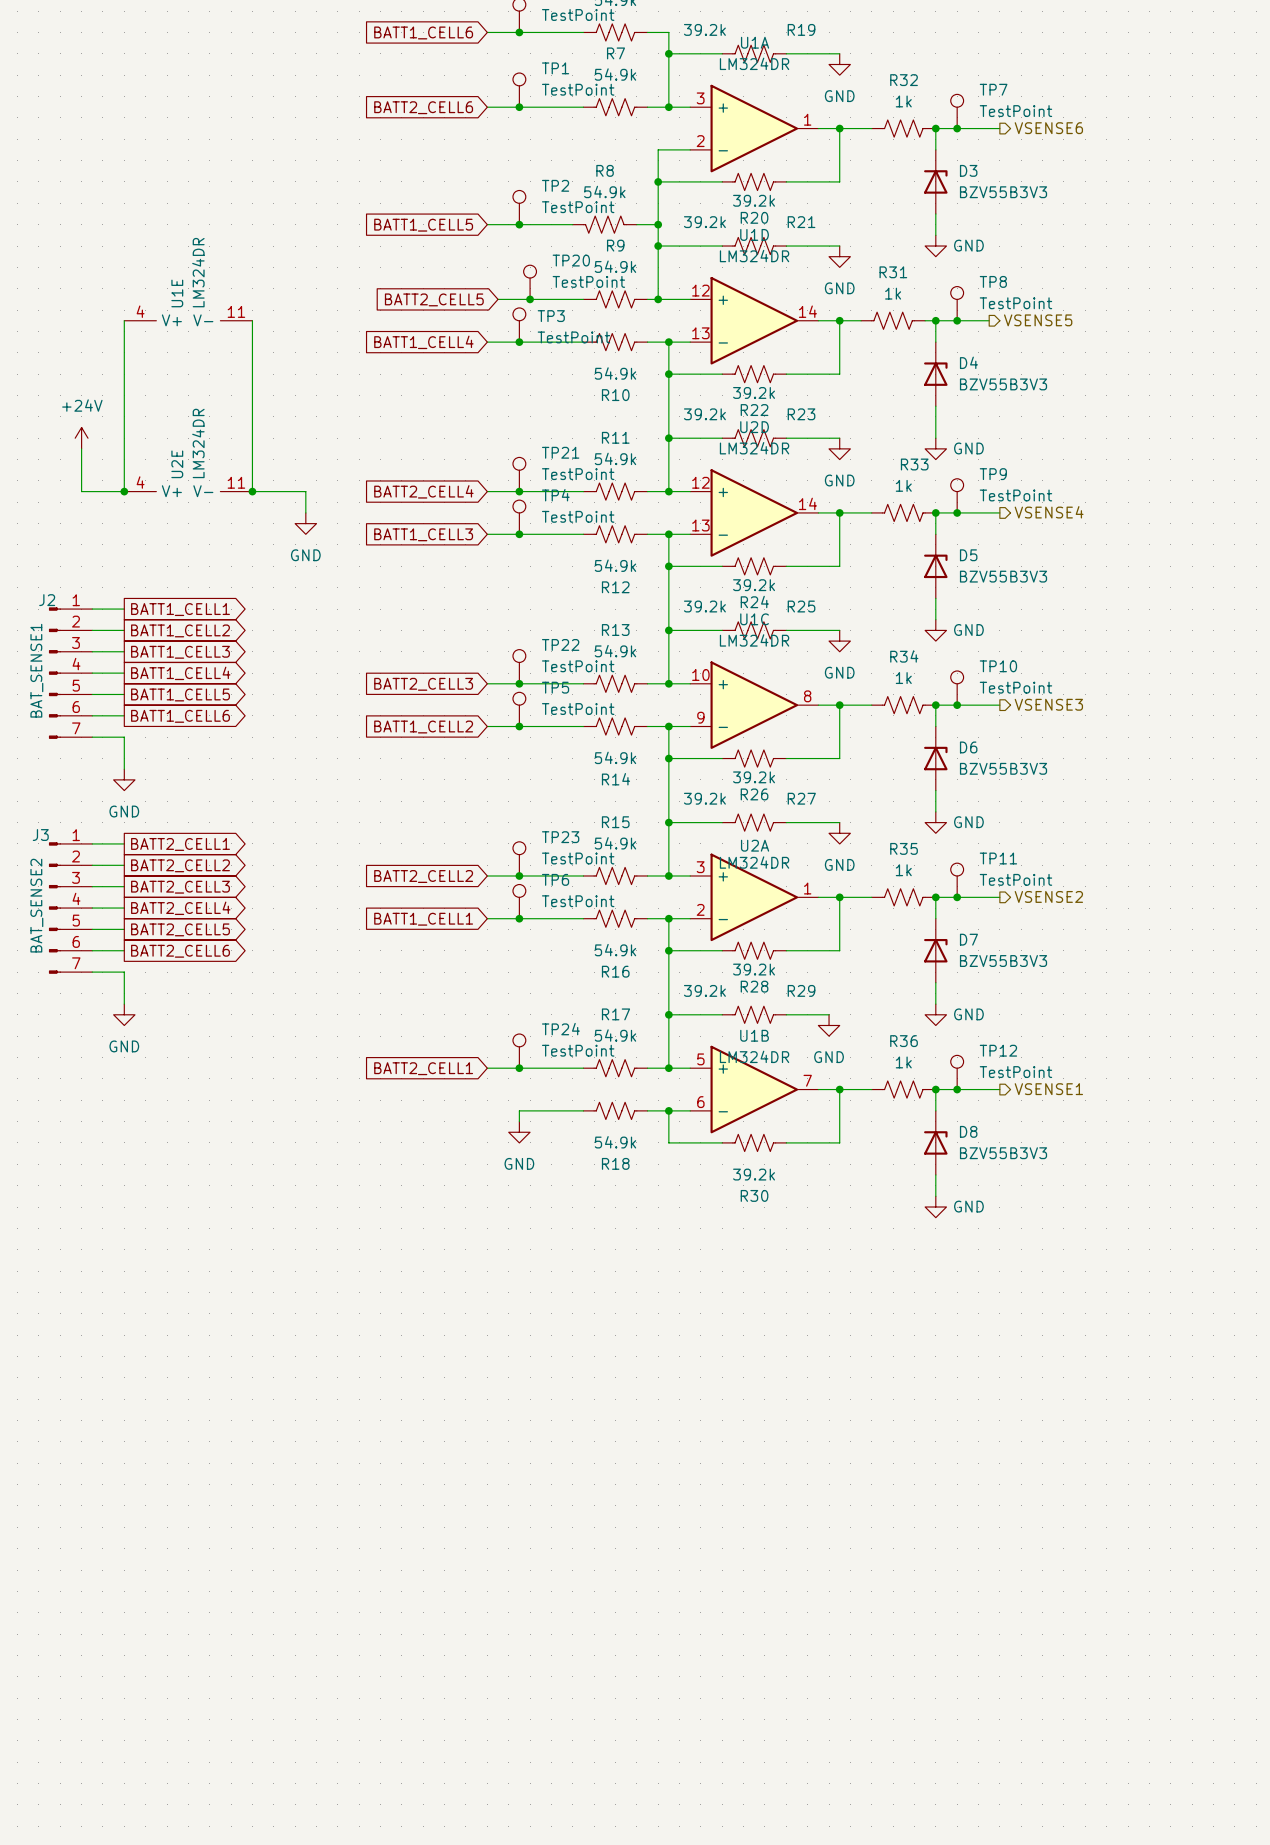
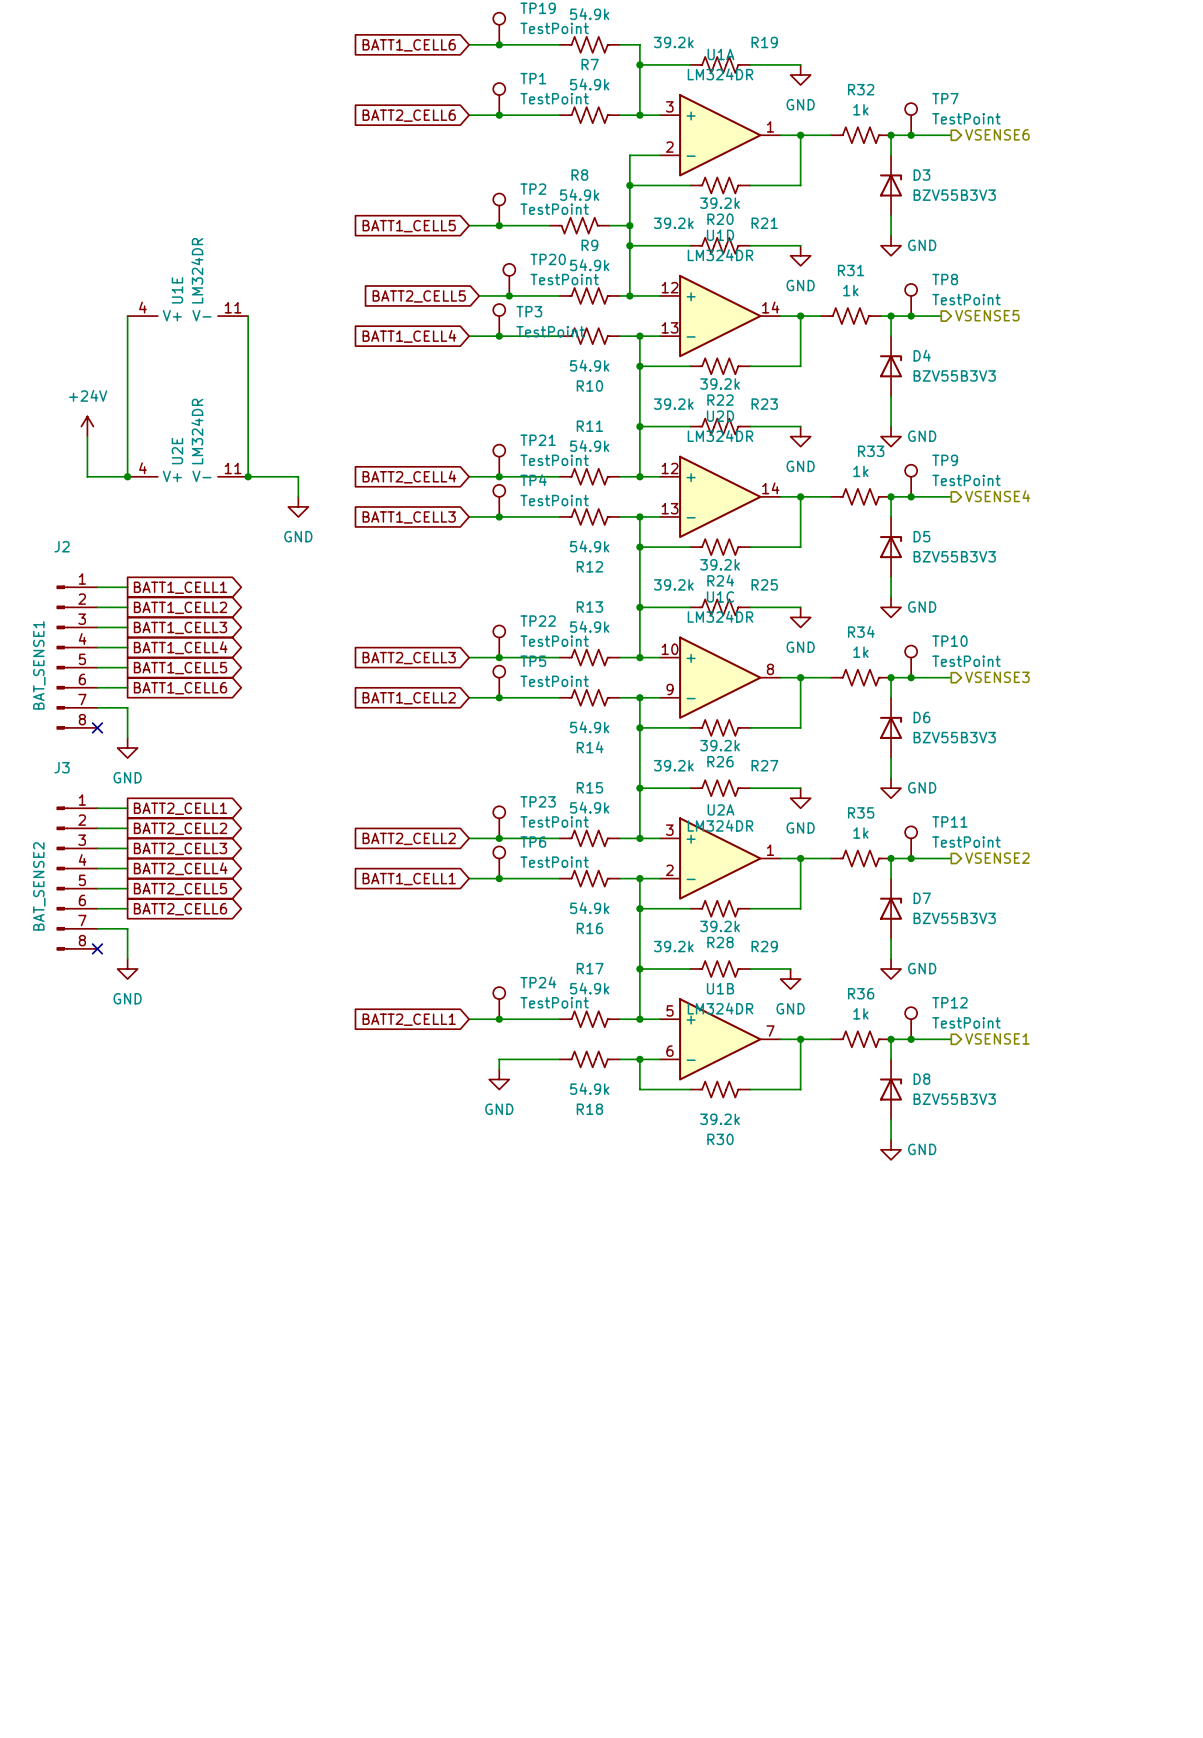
J2 name position: J2 (47, 600) -> J2 (62, 546)
J2 symbol: [48, 607, 93, 739] -> [56, 585, 98, 730]
no-connect mark: none -> (97, 727)
J3 name position: J3 (40, 835) -> J3 (62, 767)
J3 symbol: [48, 842, 93, 974] -> [56, 806, 98, 951]
no-connect mark: none -> (97, 948)

